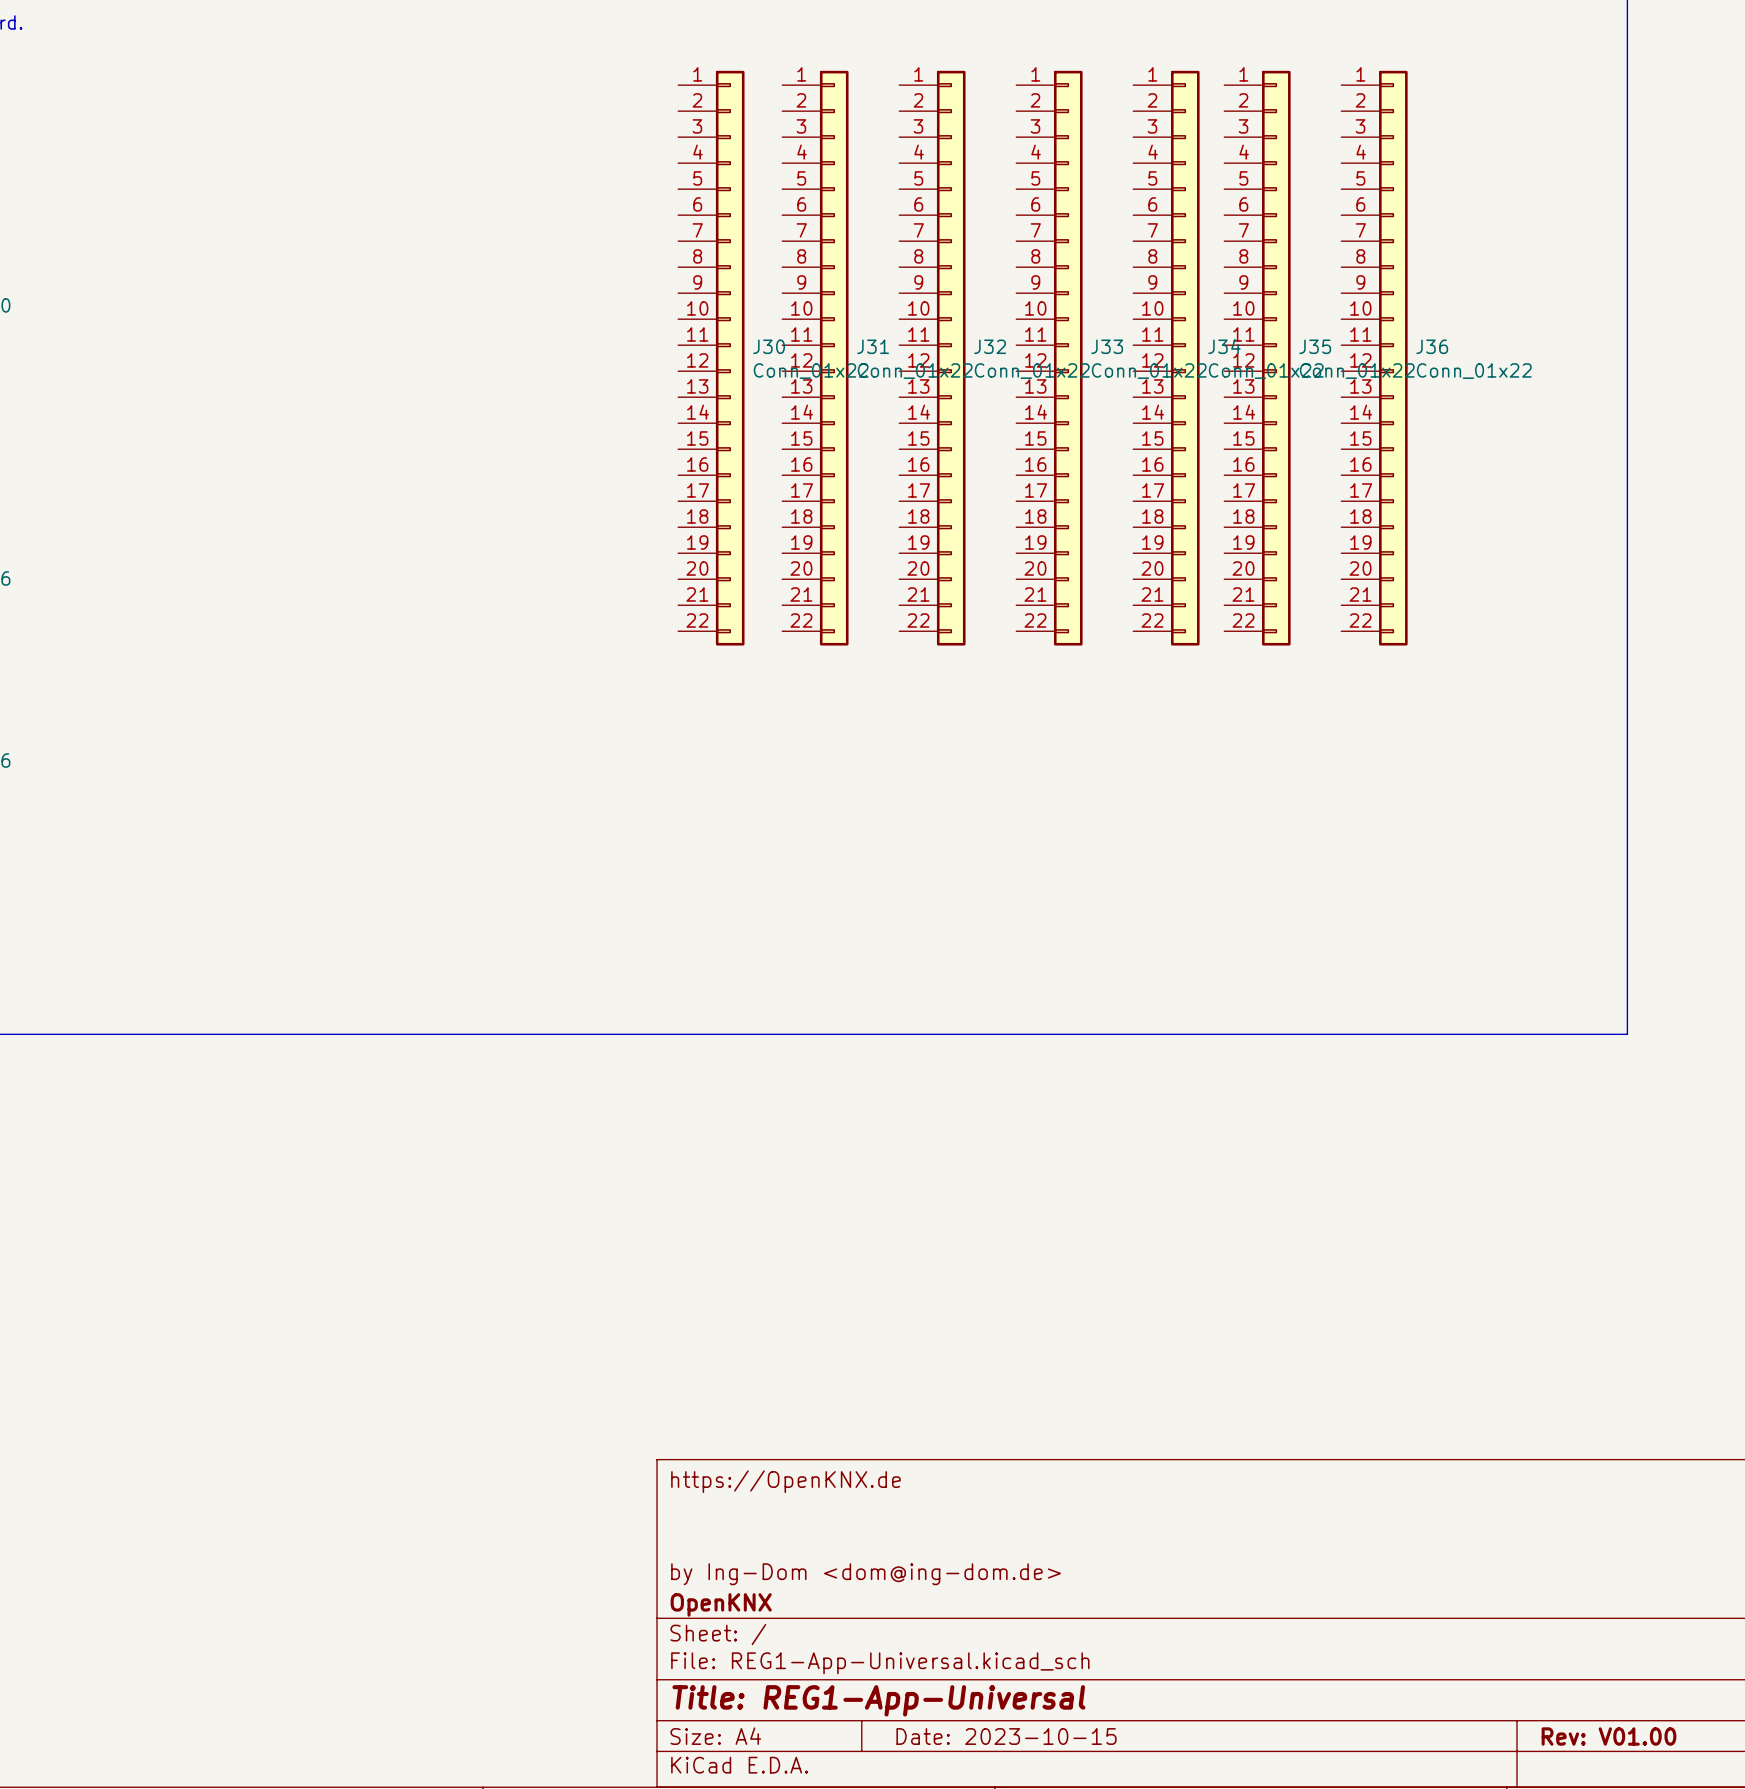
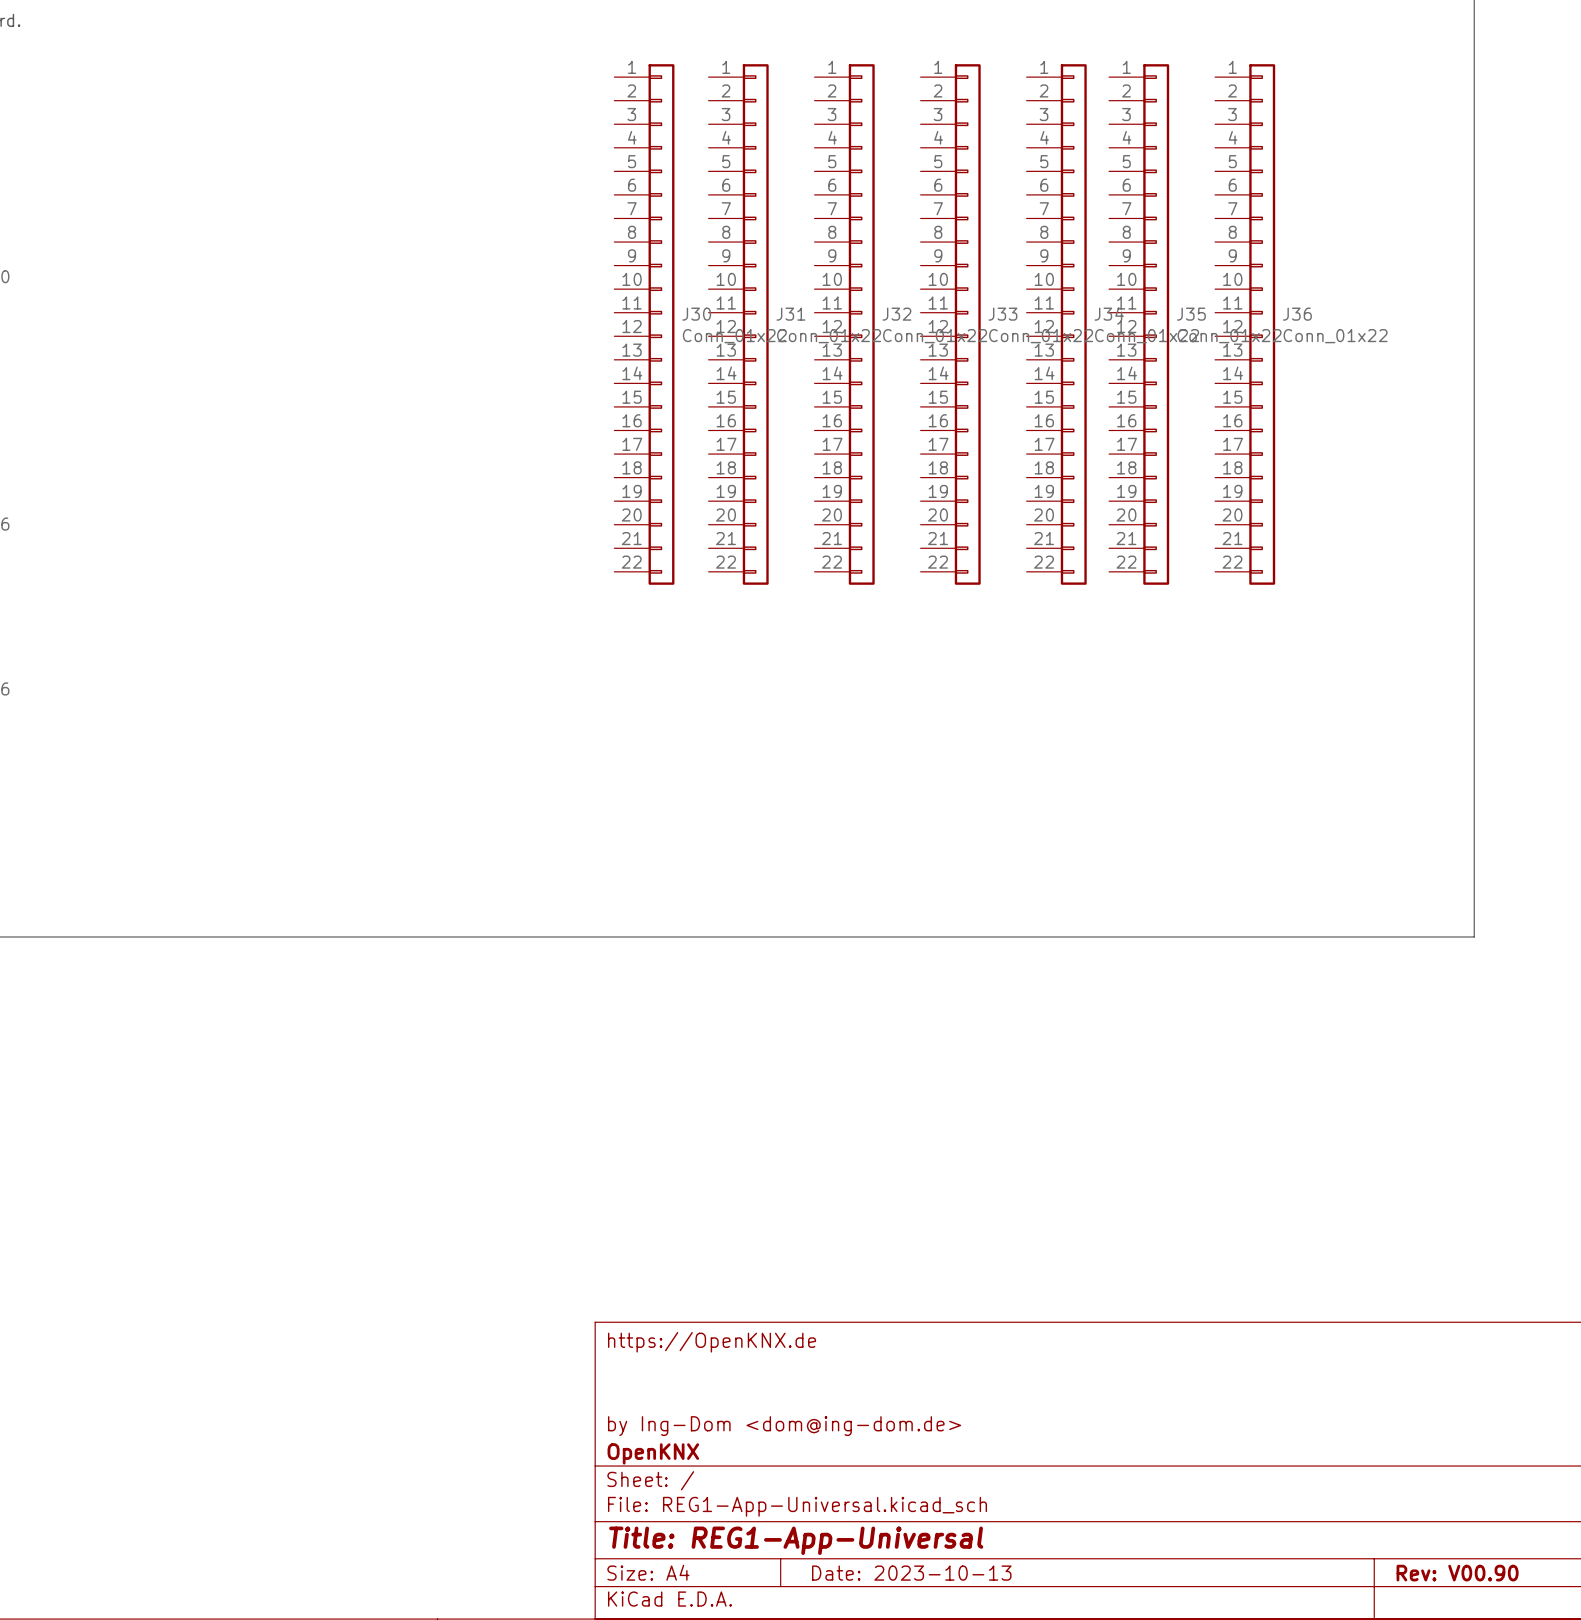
title block: Date: 2023-10-15 (1006, 1736) -> Date: 2023-10-13 (911, 1573)
title block: Rev: V01.00 (1608, 1736) -> Rev: V00.90 (1457, 1573)

